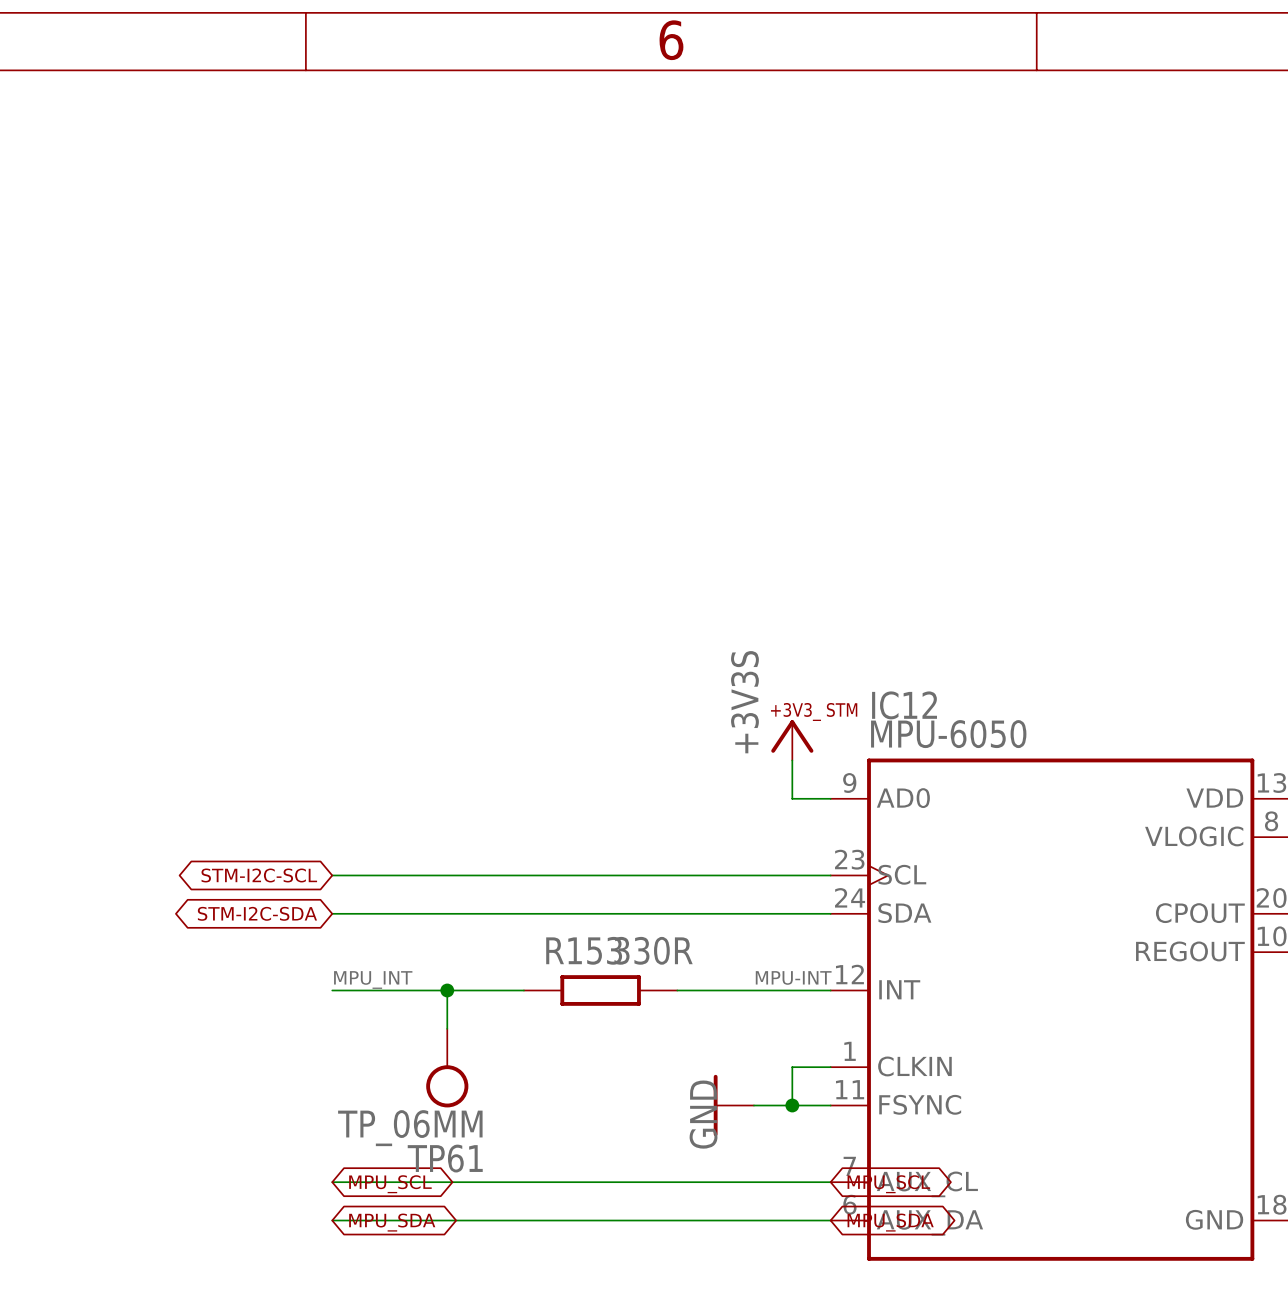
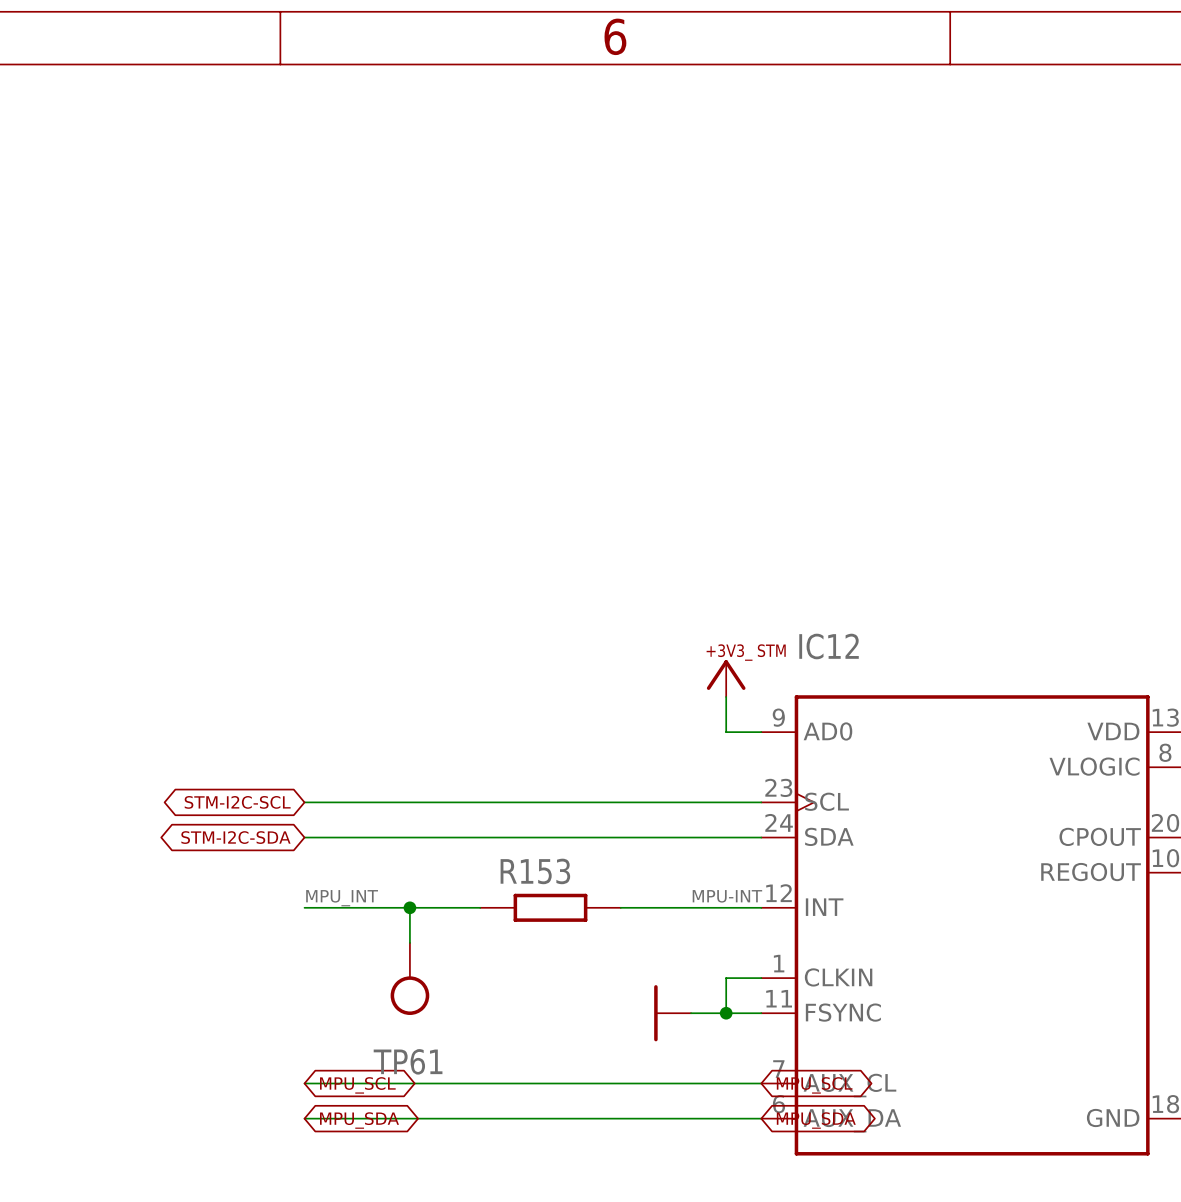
power symbol text: +3V3S (744, 702) -> none
IC12 value: MPU-6050 (948, 734) -> none
R153 value: 330R (653, 950) -> none
power symbol text: GND (703, 1114) -> none
TP61 value: TP_06MM (410, 1128) -> none

